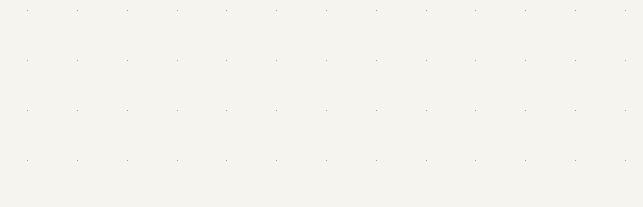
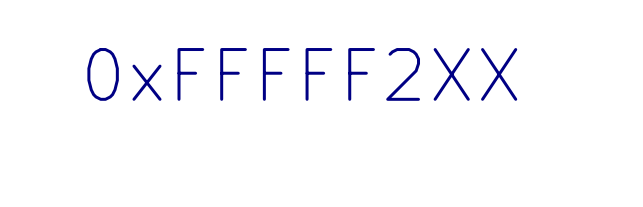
text: none -> 0xFFFFF2XX (302, 74)

